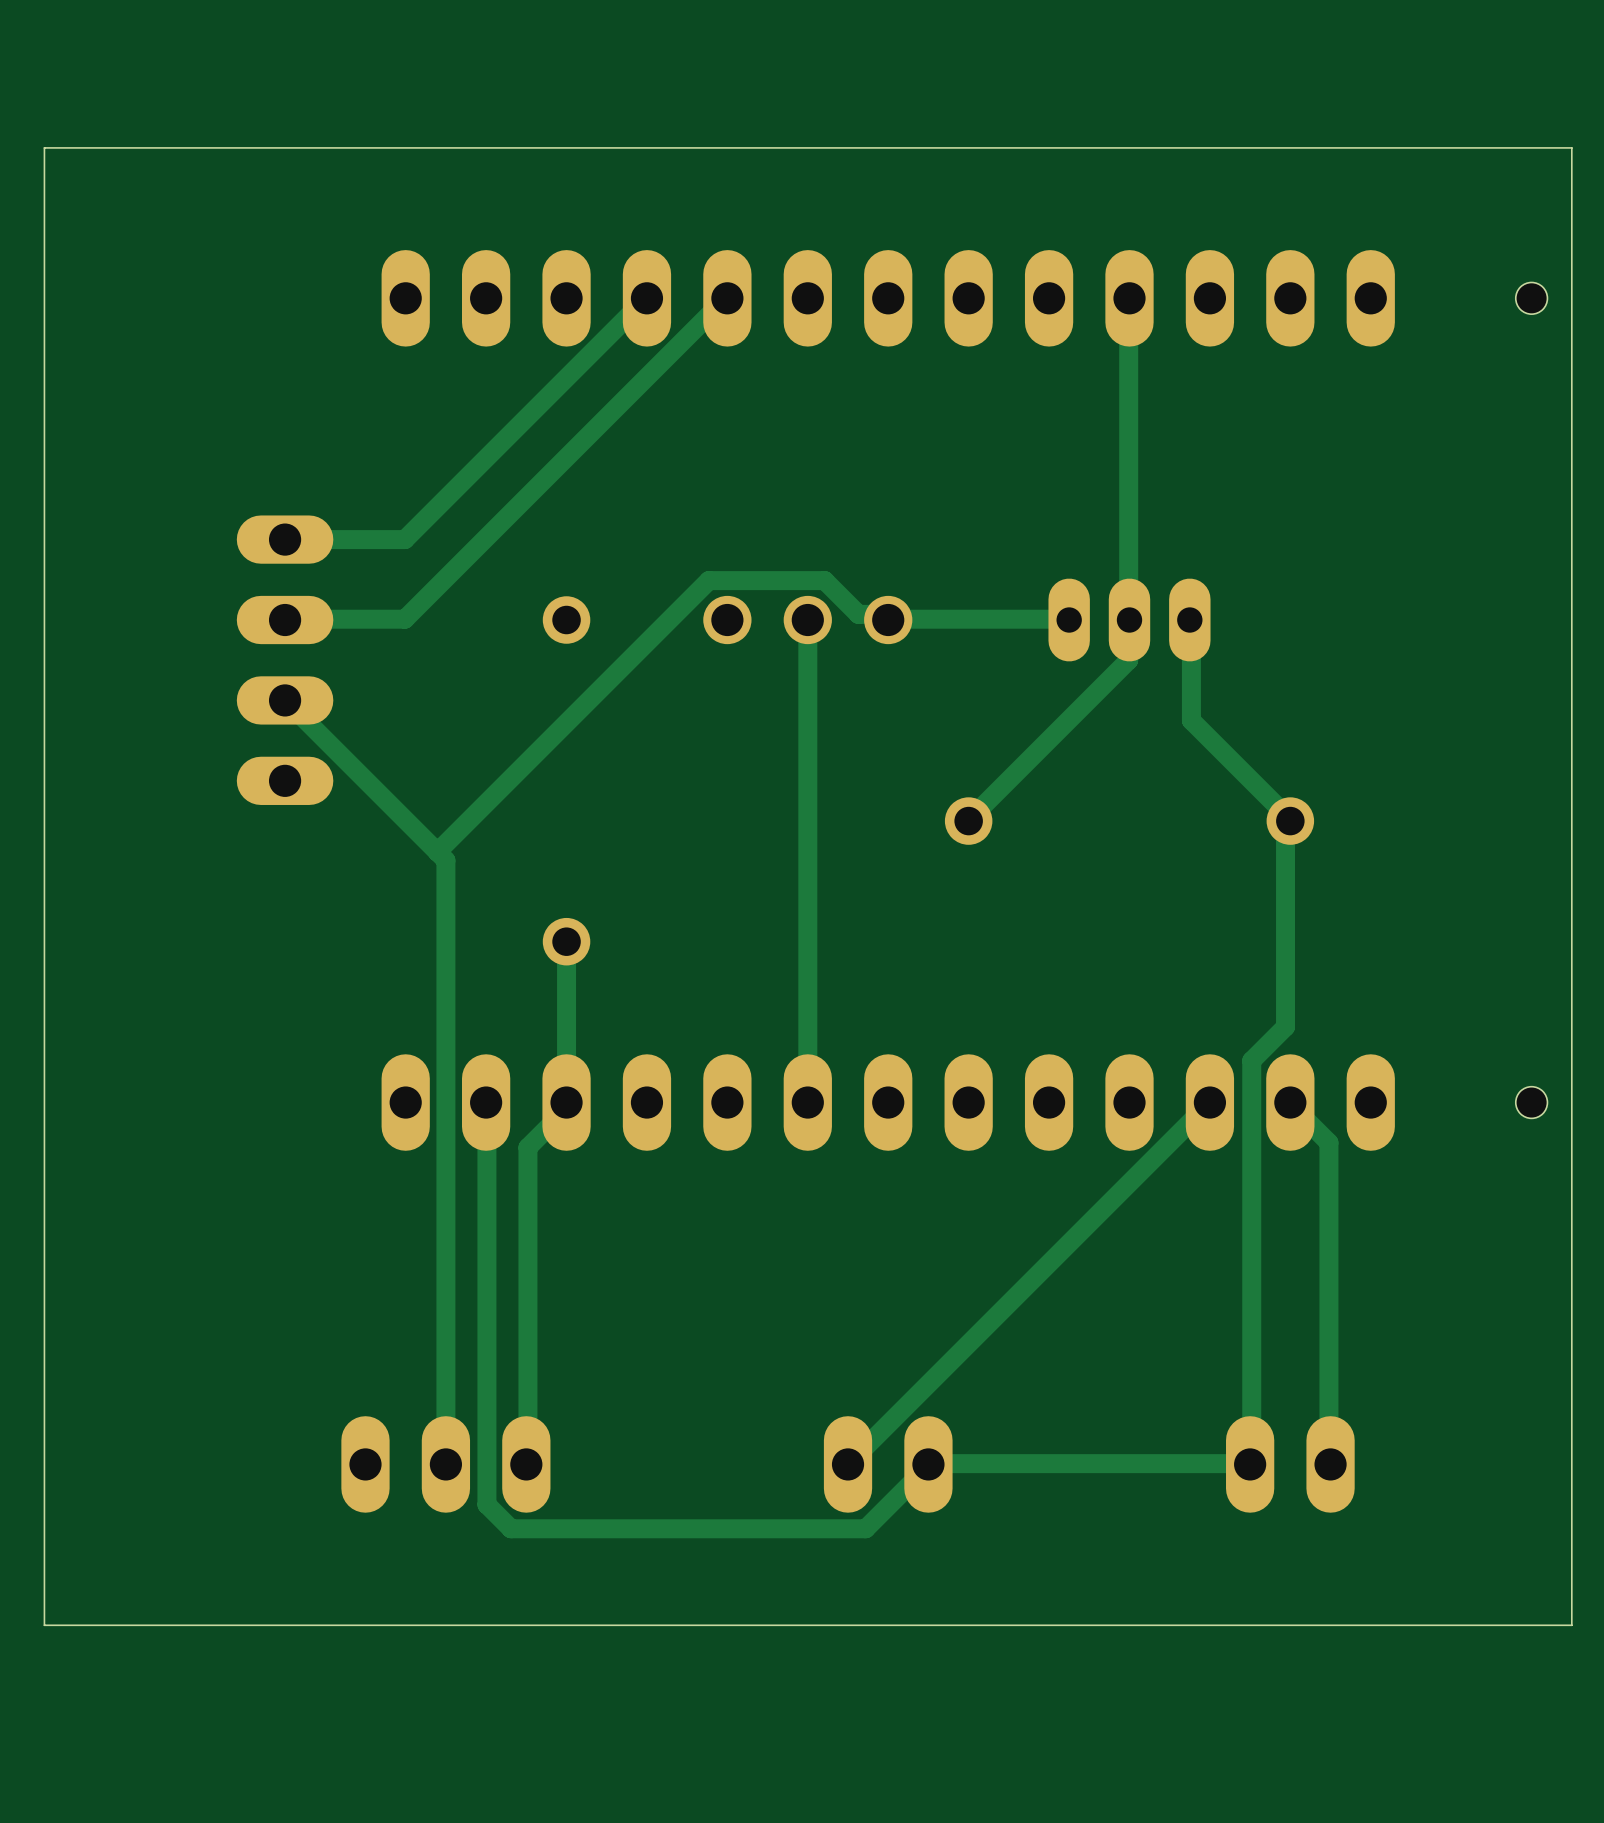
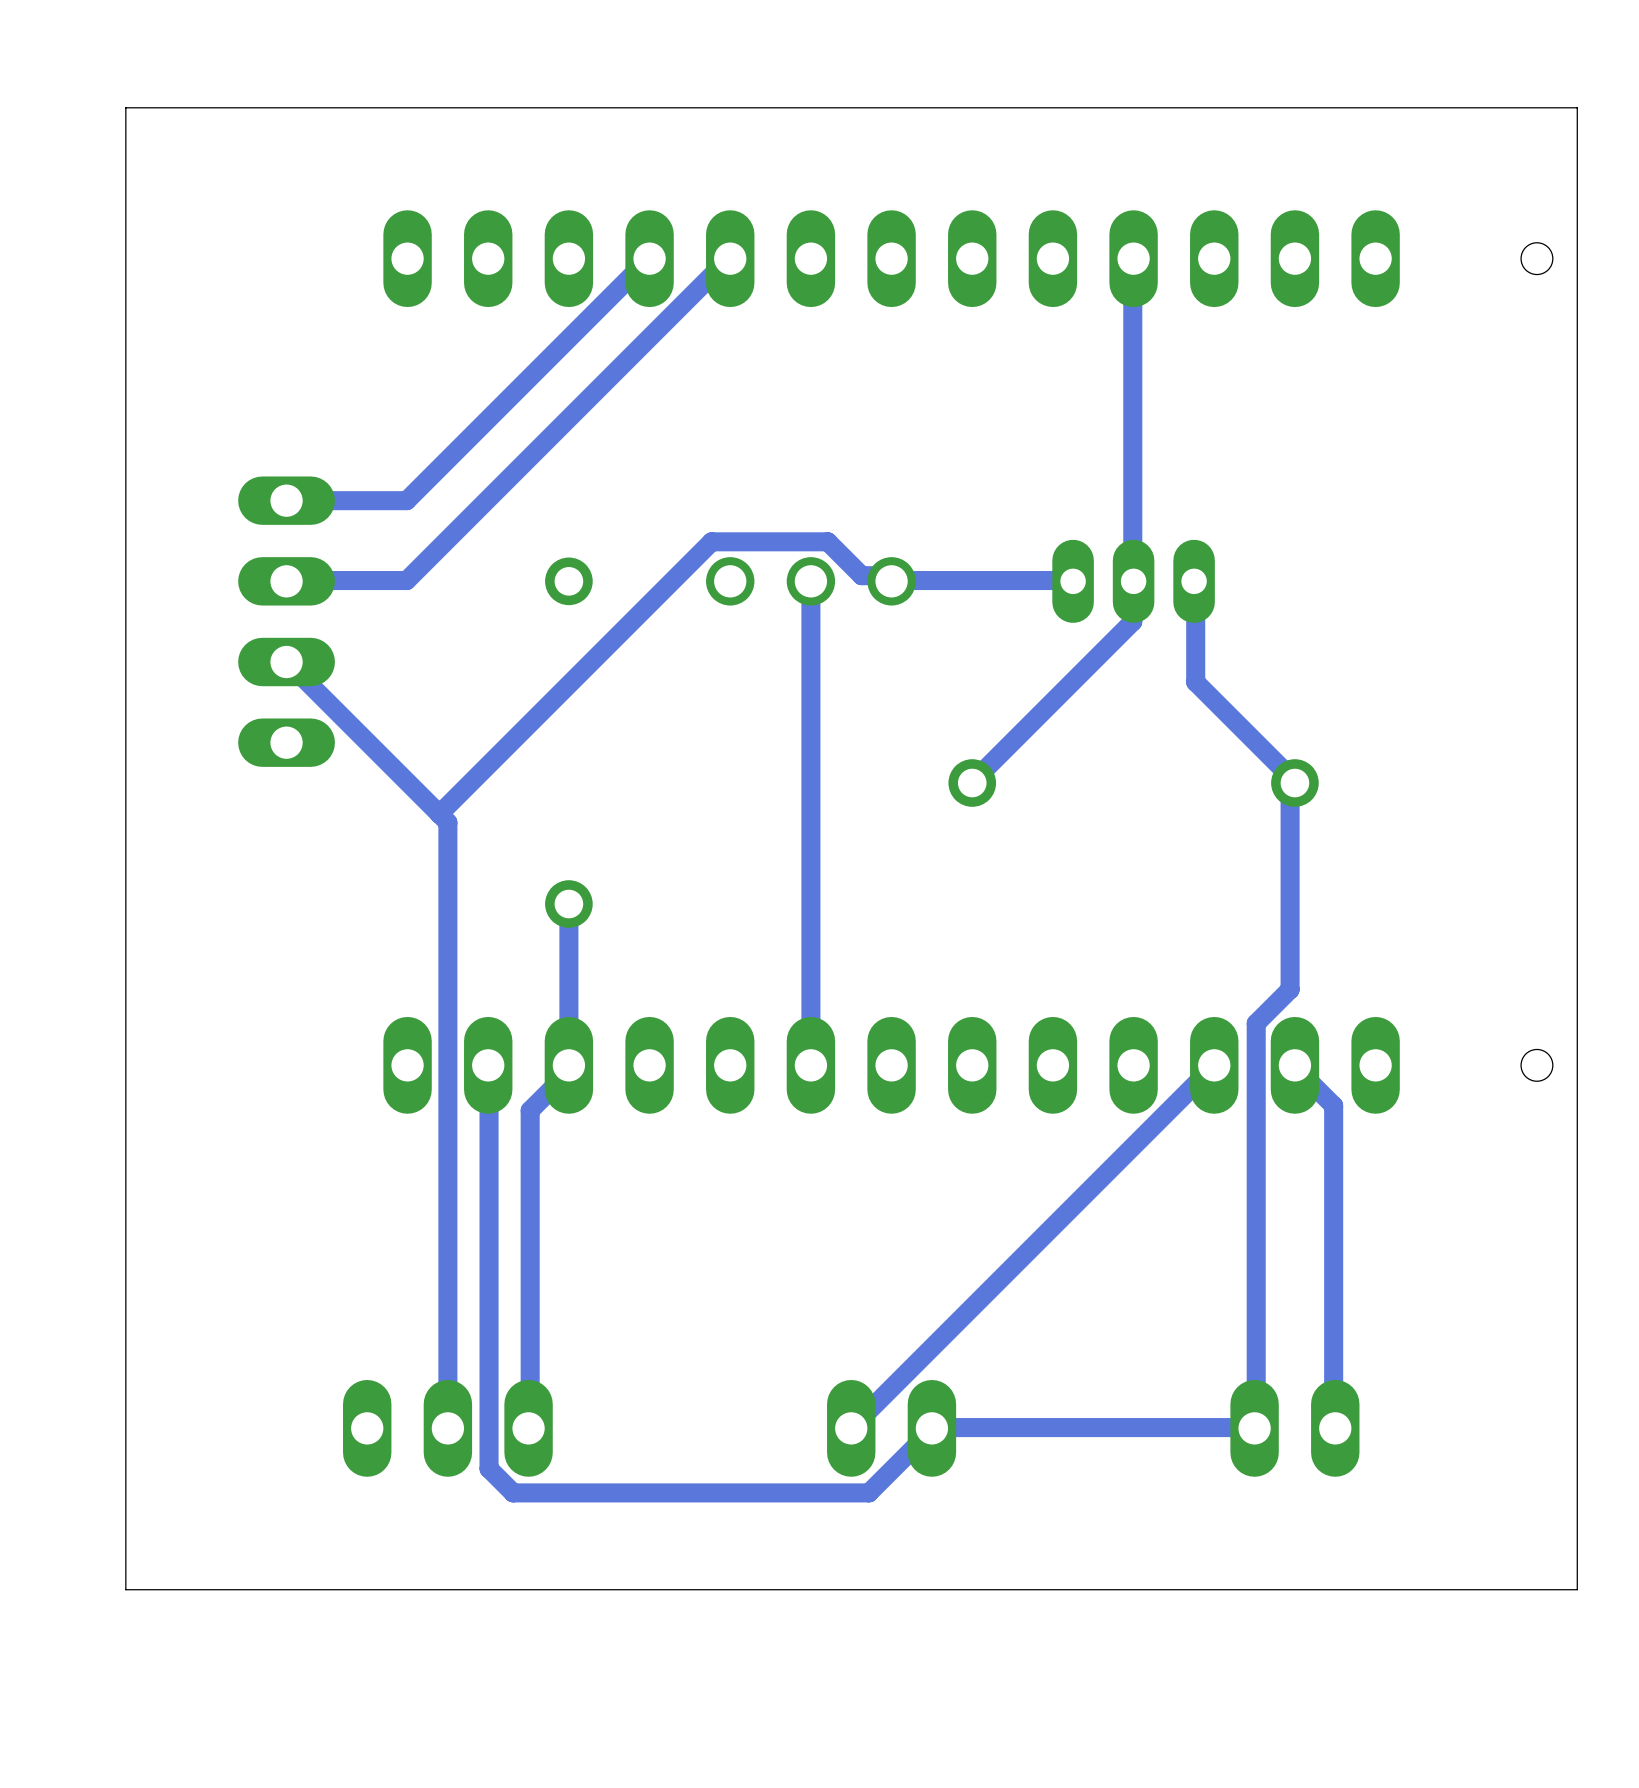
board edge: (124, 147) (44, 147) (44, 1625) (124, 1625) -> (125, 107) (125, 1589)

